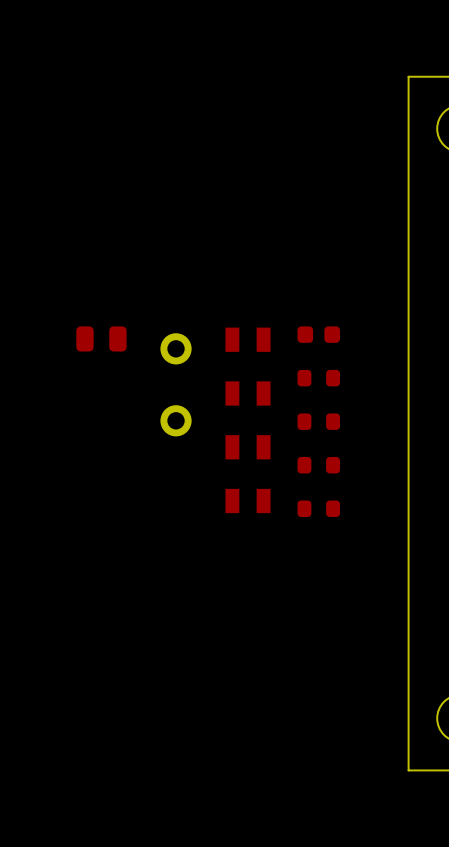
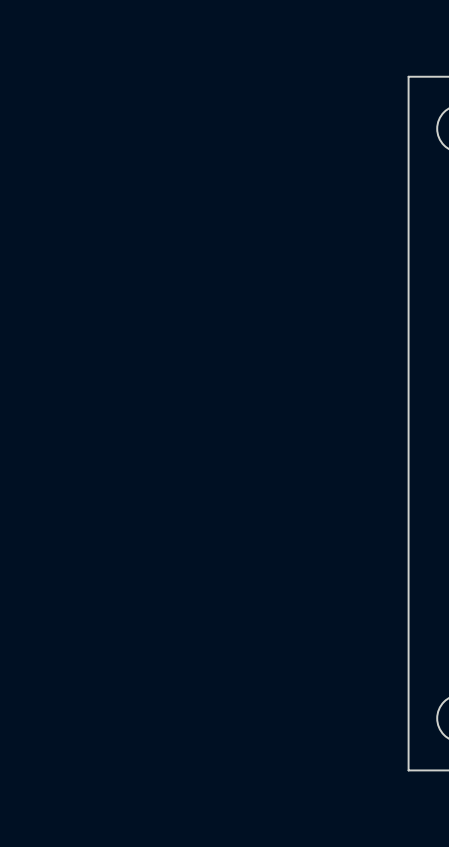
part: (318, 334) -> none
part: (101, 338) -> none
part: (247, 339) -> none
part: (176, 348) -> none
part: (318, 378) -> none
part: (247, 393) -> none
part: (176, 420) -> none
part: (318, 421) -> none
part: (247, 447) -> none
part: (318, 465) -> none
part: (247, 501) -> none
part: (318, 508) -> none

